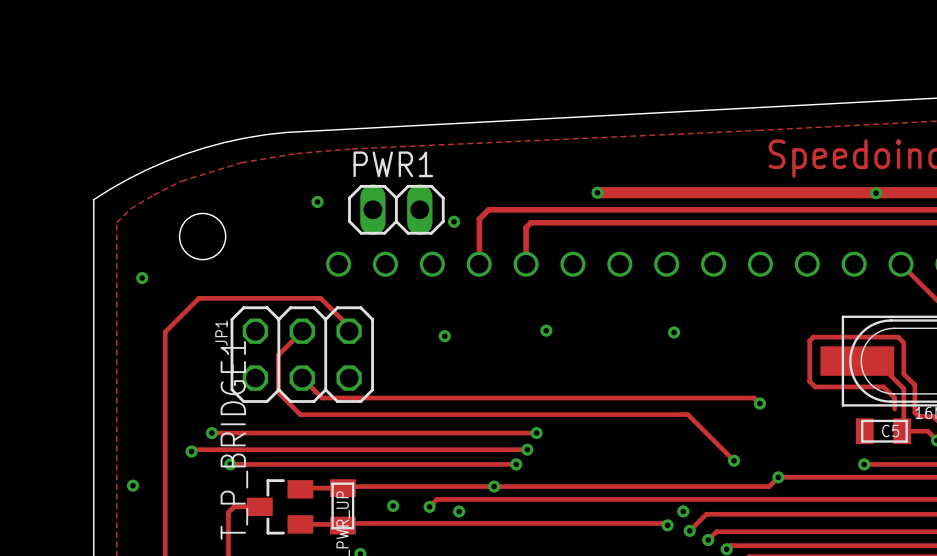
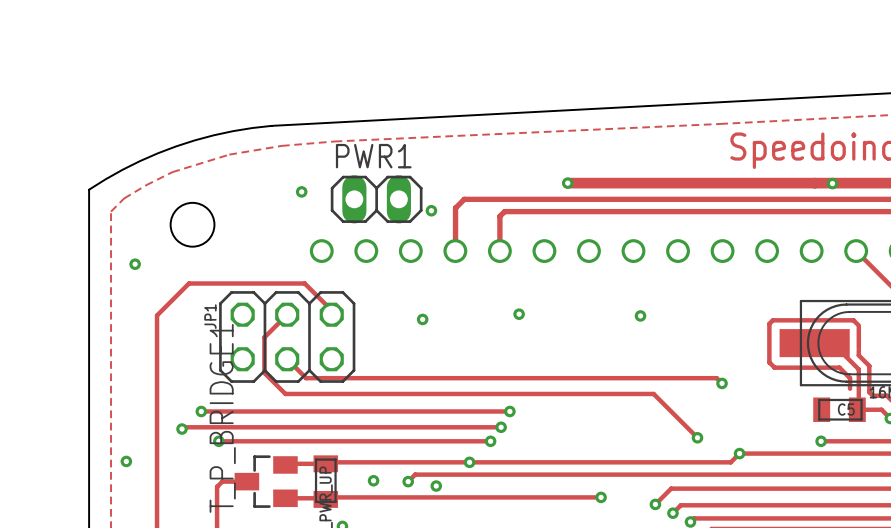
via: (683, 511) -> none
track: (632, 523) (665, 523) (667, 525) -> none
via: none -> (601, 497)
via: (667, 525) -> none

